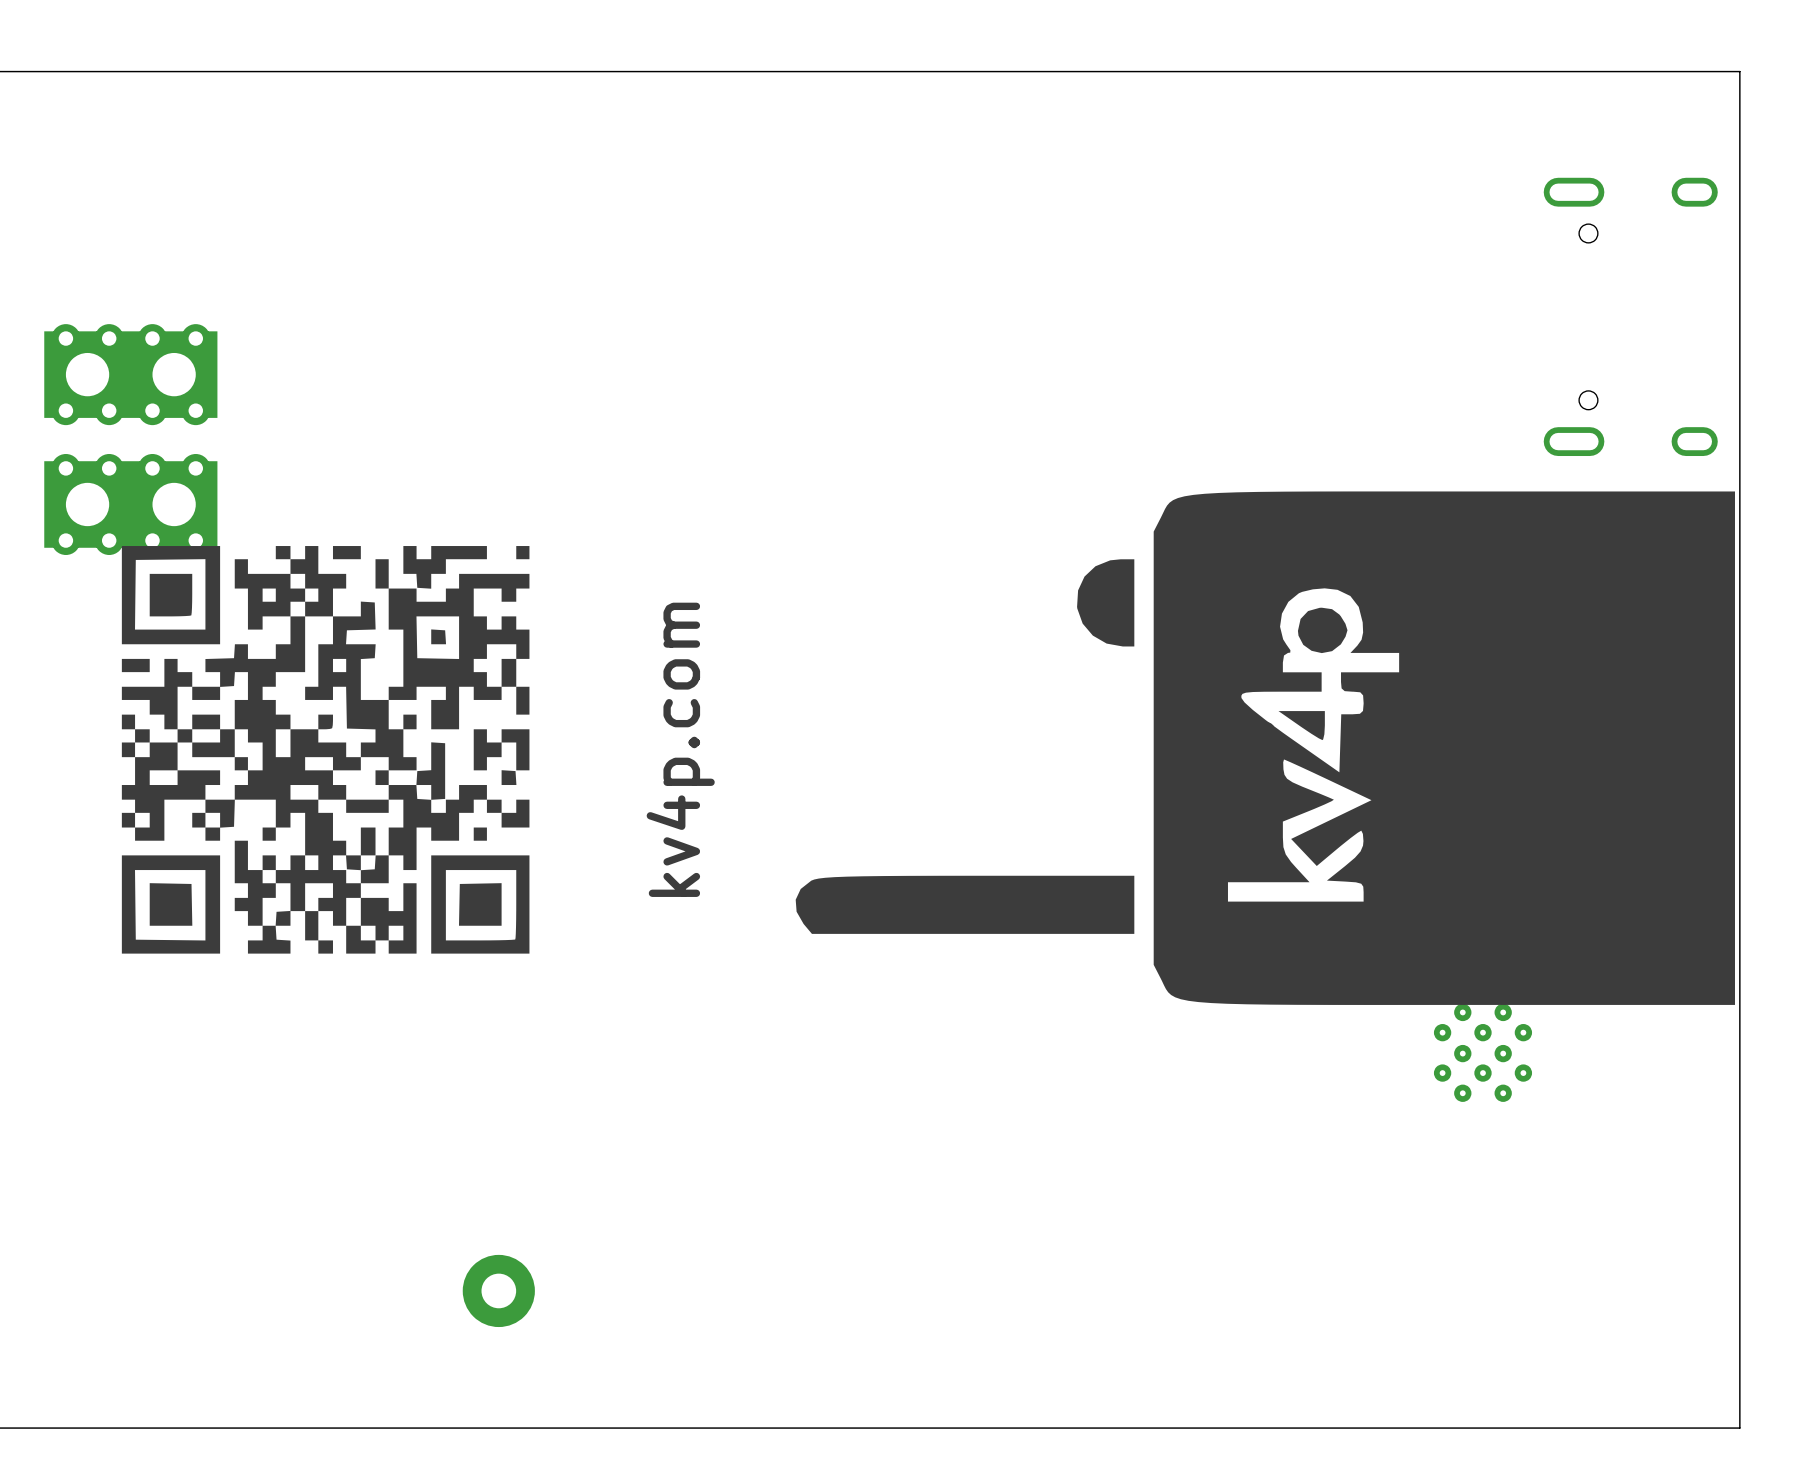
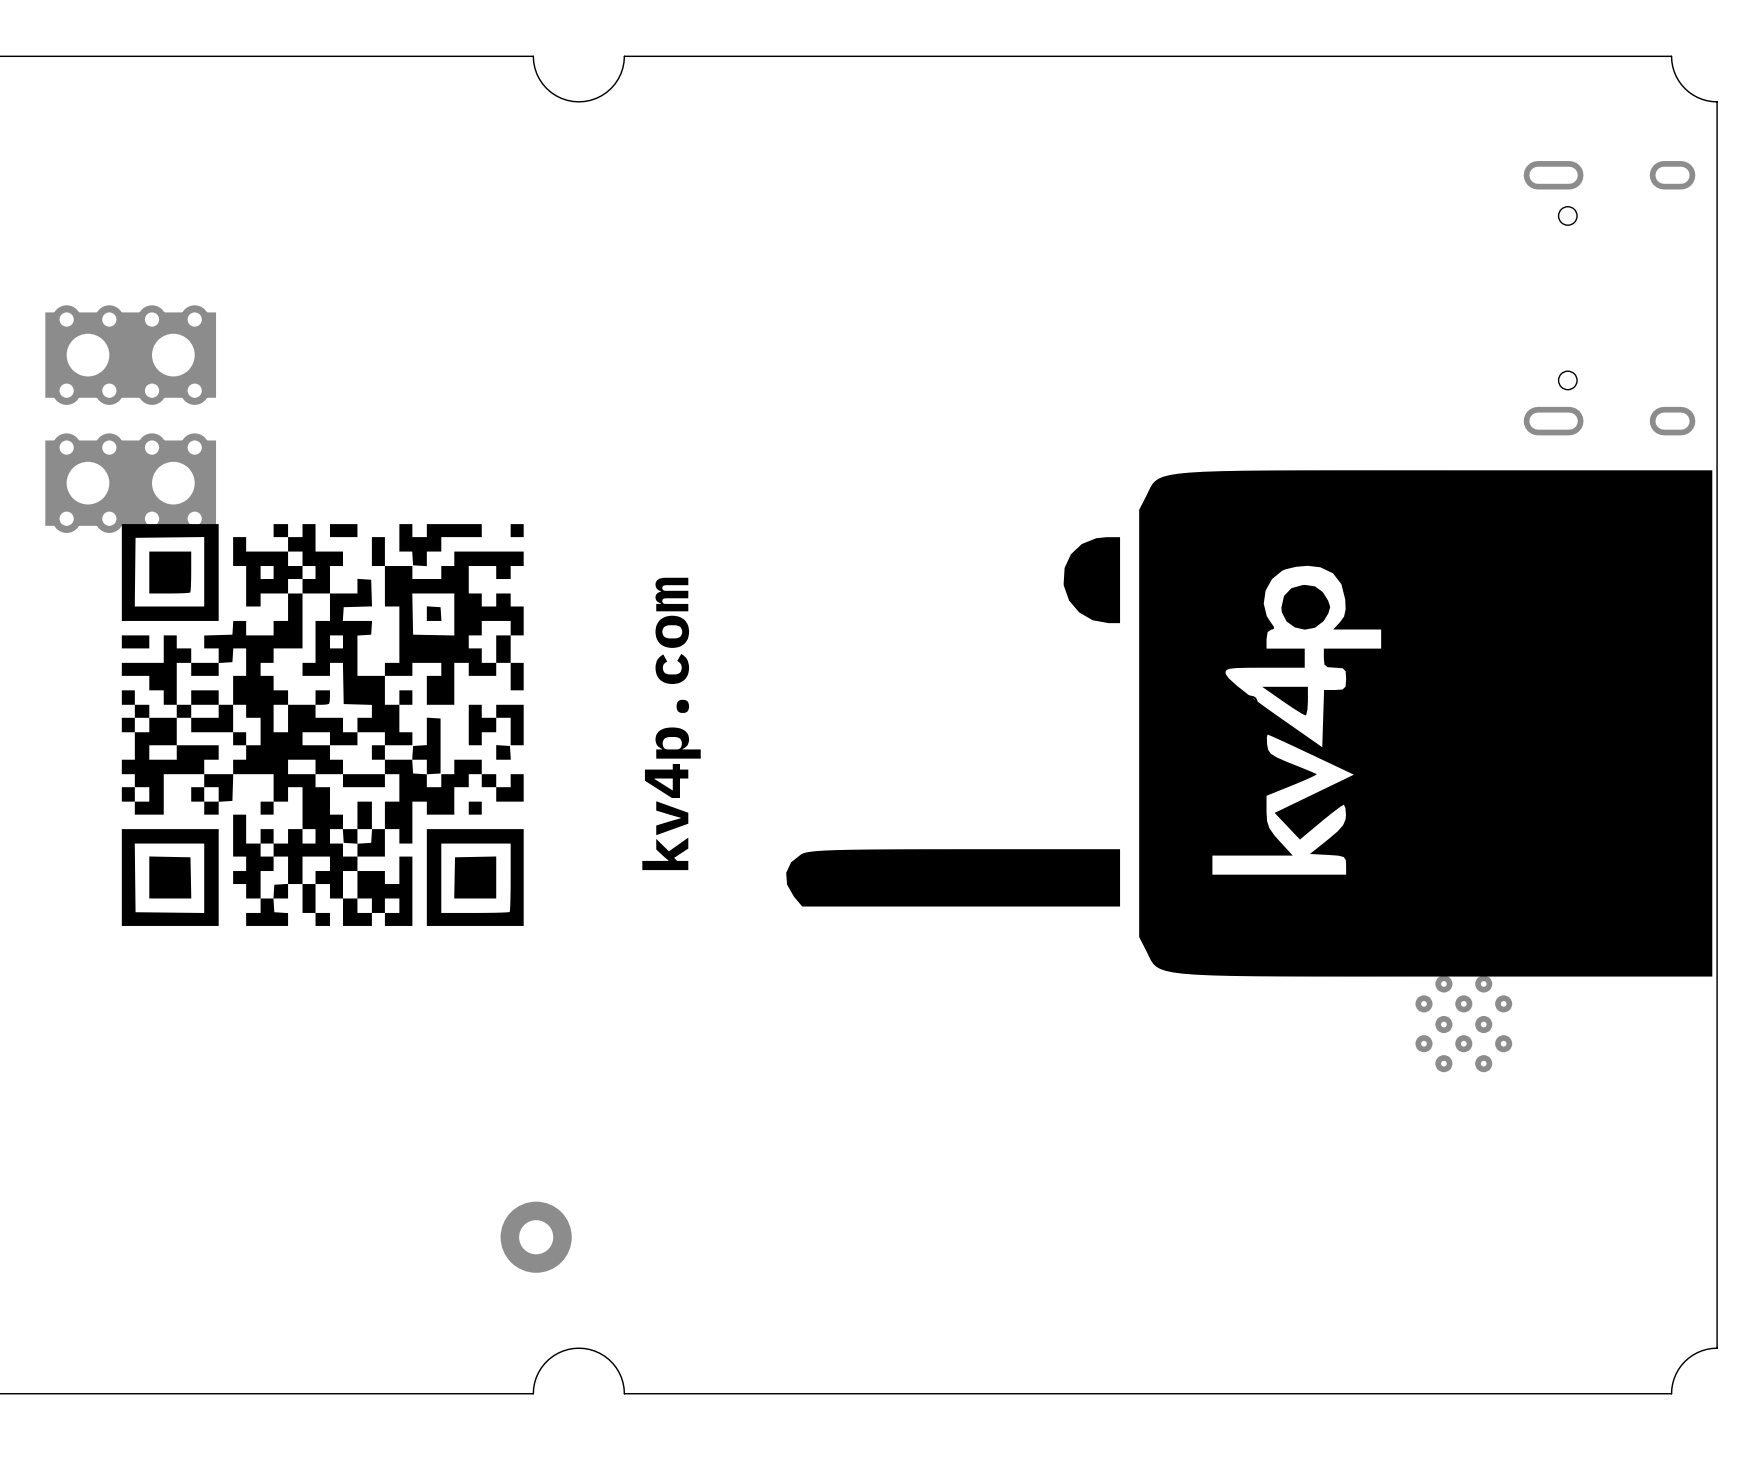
board edge: (631, 71) (539, 71) -> (624, 56) (620, 73) (611, 88) (596, 98) (578, 101) (561, 98) (546, 88) (536, 73) (533, 56)
board edge: (1693, 71) (1739, 71) (1739, 117) -> (1671, 56) (1674, 71) (1684, 88) (1702, 99) (1717, 101)
part position: (498, 1290) -> (536, 1237)
board edge: (1739, 1381) (1739, 1428) (1693, 1428) -> (1717, 1348) (1702, 1350) (1684, 1361) (1674, 1378) (1671, 1393)
board edge: (631, 1428) (539, 1428) -> (624, 1393) (621, 1377) (612, 1363) (600, 1353) (578, 1348) (562, 1351) (548, 1359) (538, 1372) (533, 1393)

